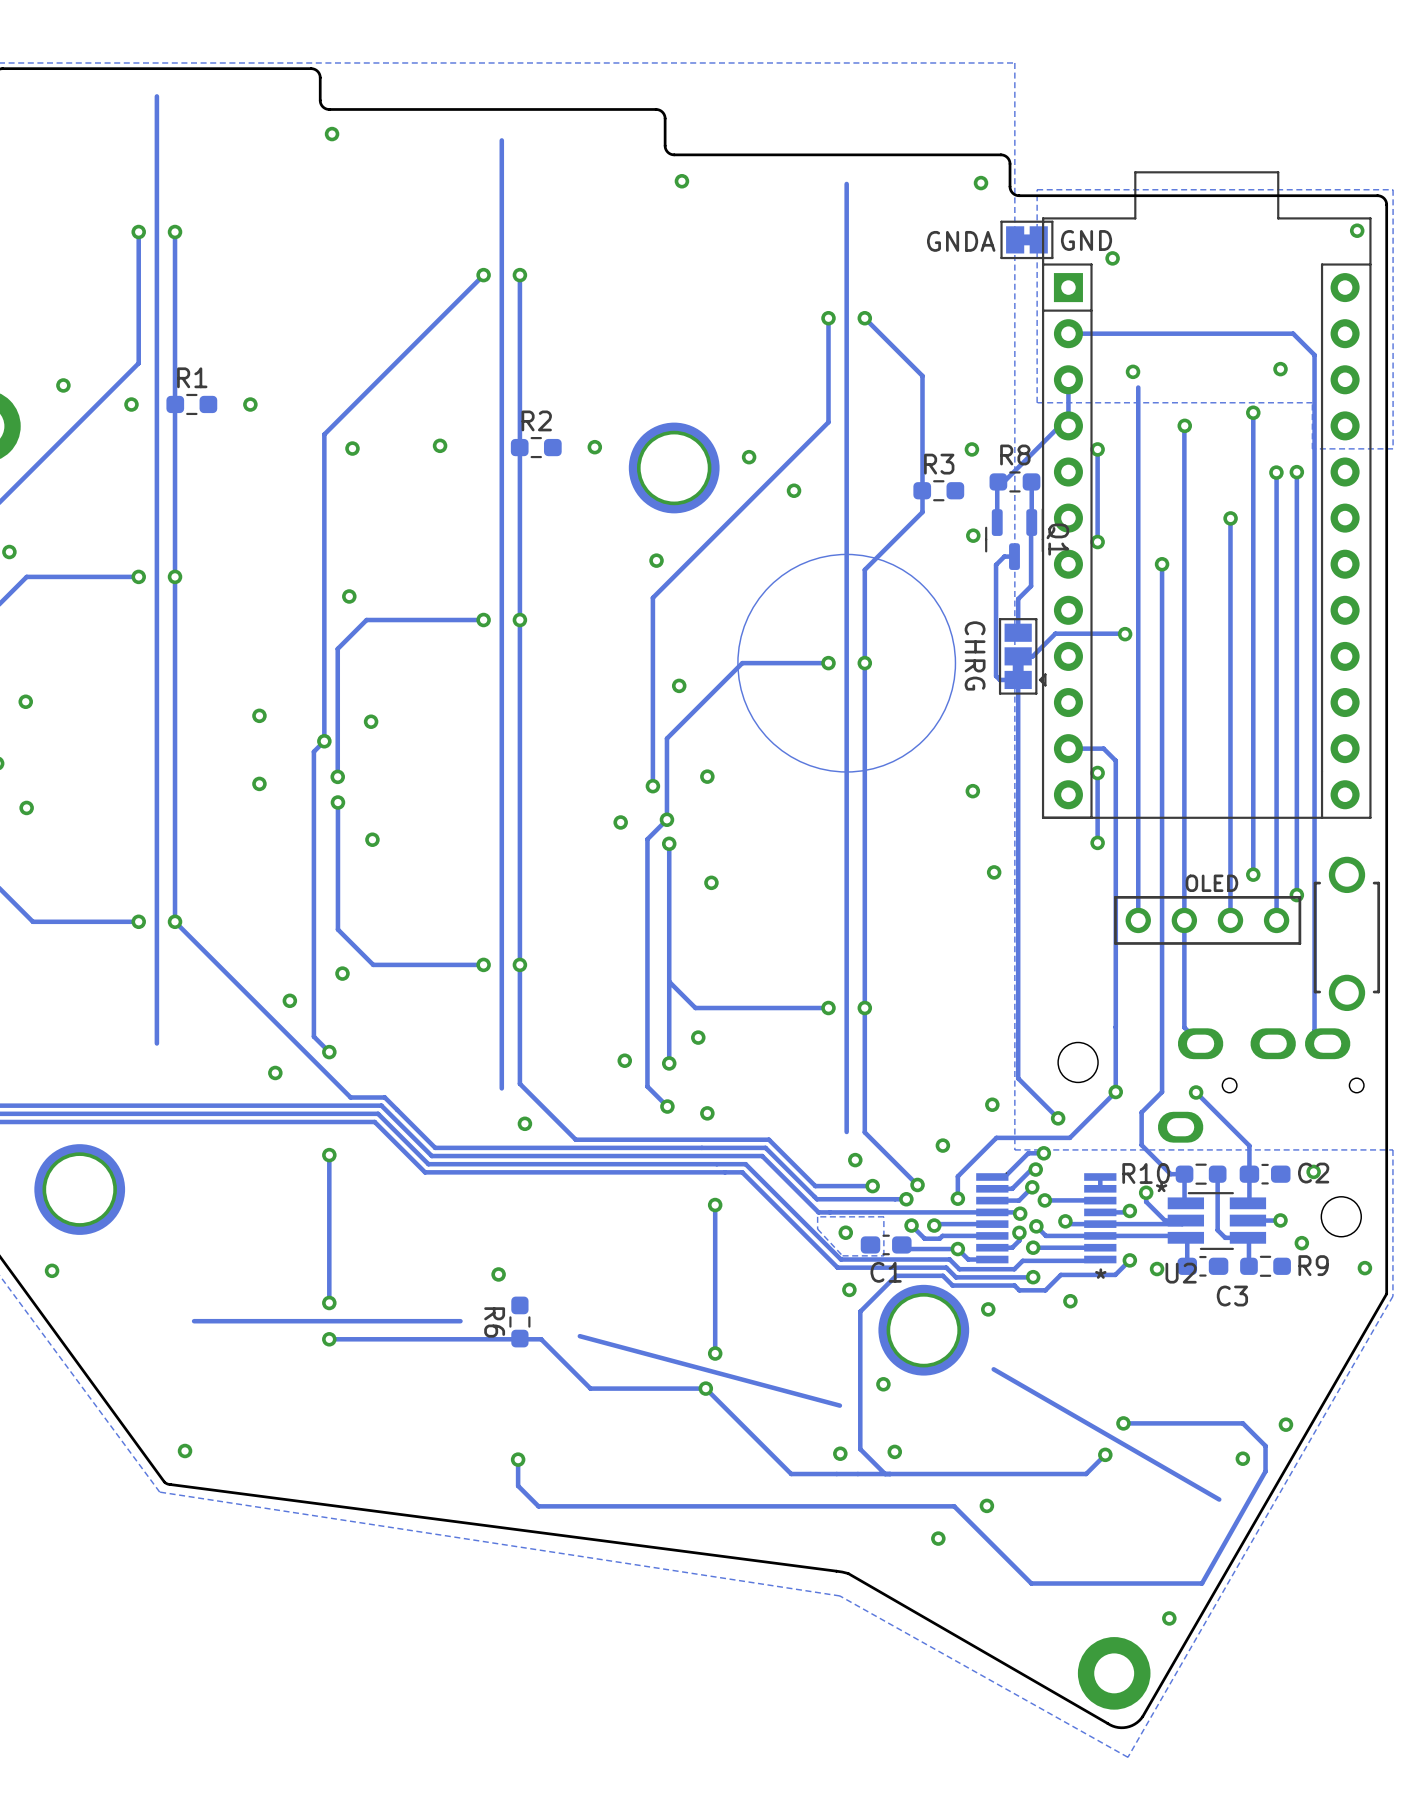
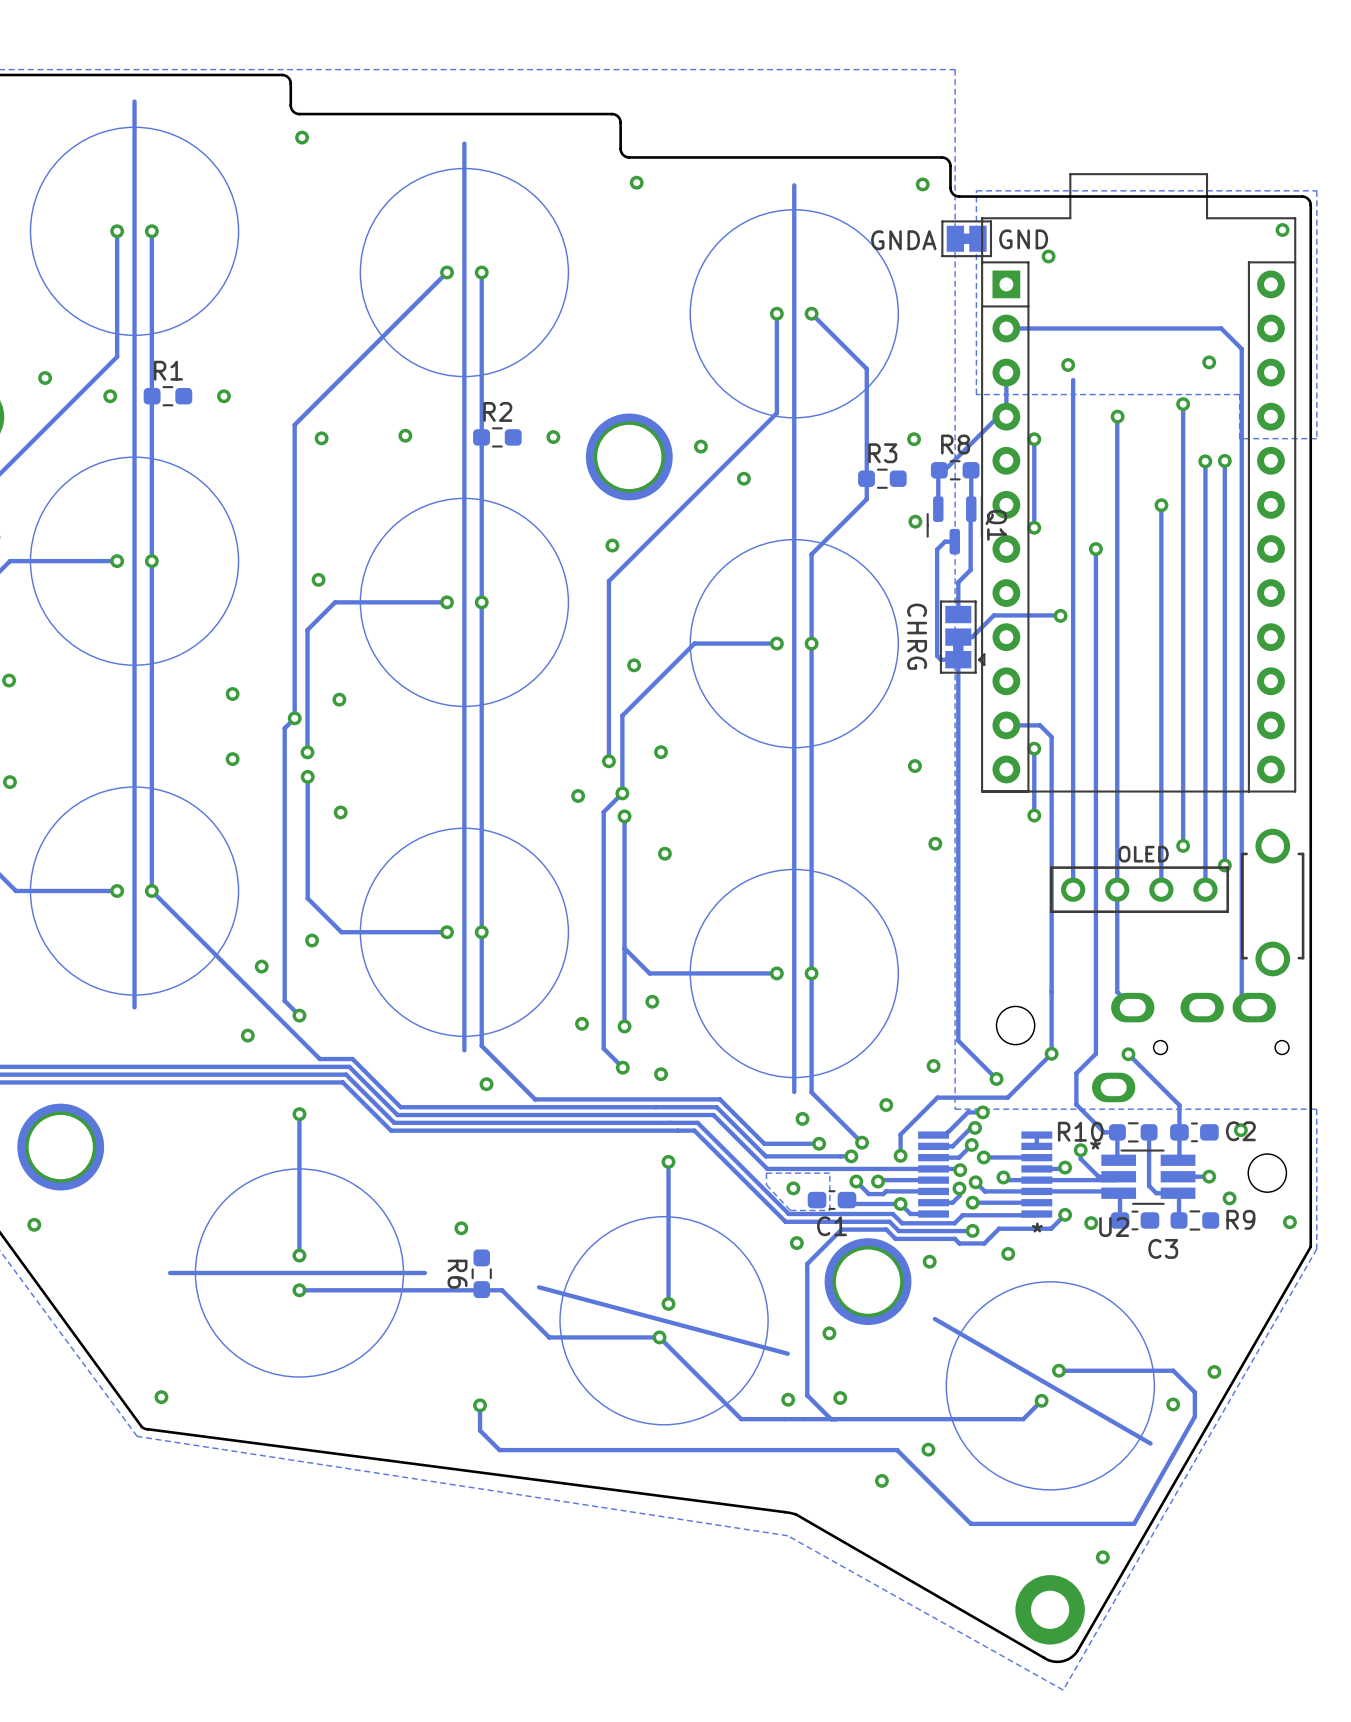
drawing: none -> [30, 127, 239, 336]
drawing: none -> [360, 168, 569, 377]
drawing: none -> [690, 209, 899, 418]
drawing: none -> [30, 457, 239, 666]
drawing: none -> [360, 498, 569, 707]
drawing: none -> [30, 786, 239, 996]
drawing: none -> [360, 828, 569, 1037]
drawing: none -> [690, 869, 899, 1078]
drawing: none -> [195, 1168, 404, 1378]
drawing: none -> [559, 1216, 769, 1425]
drawing: none -> [946, 1281, 1155, 1490]

